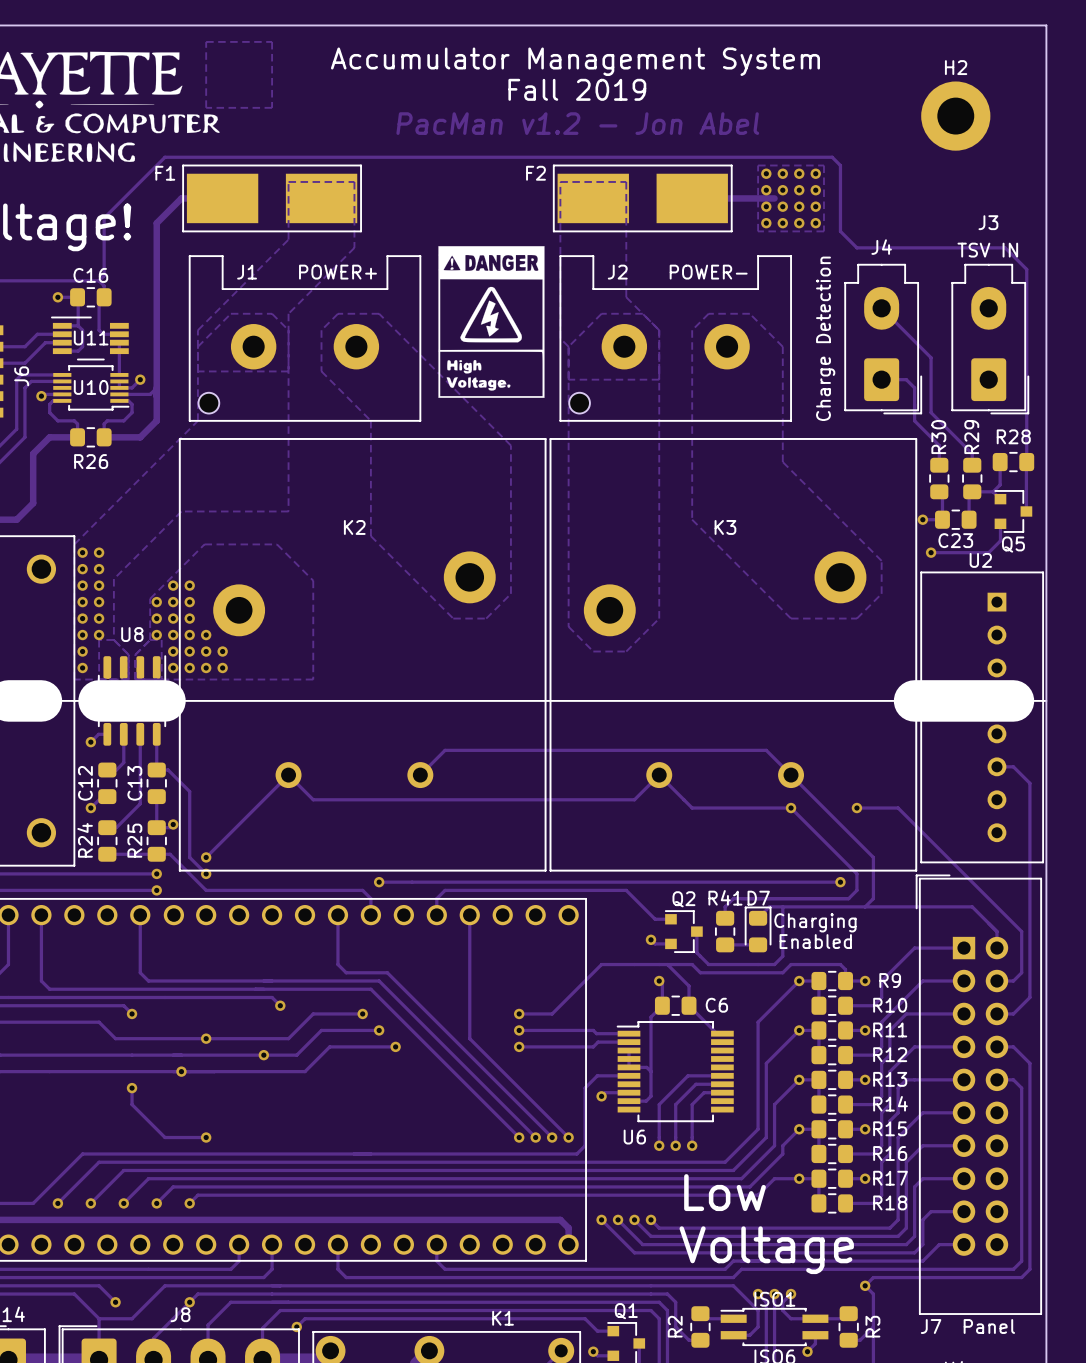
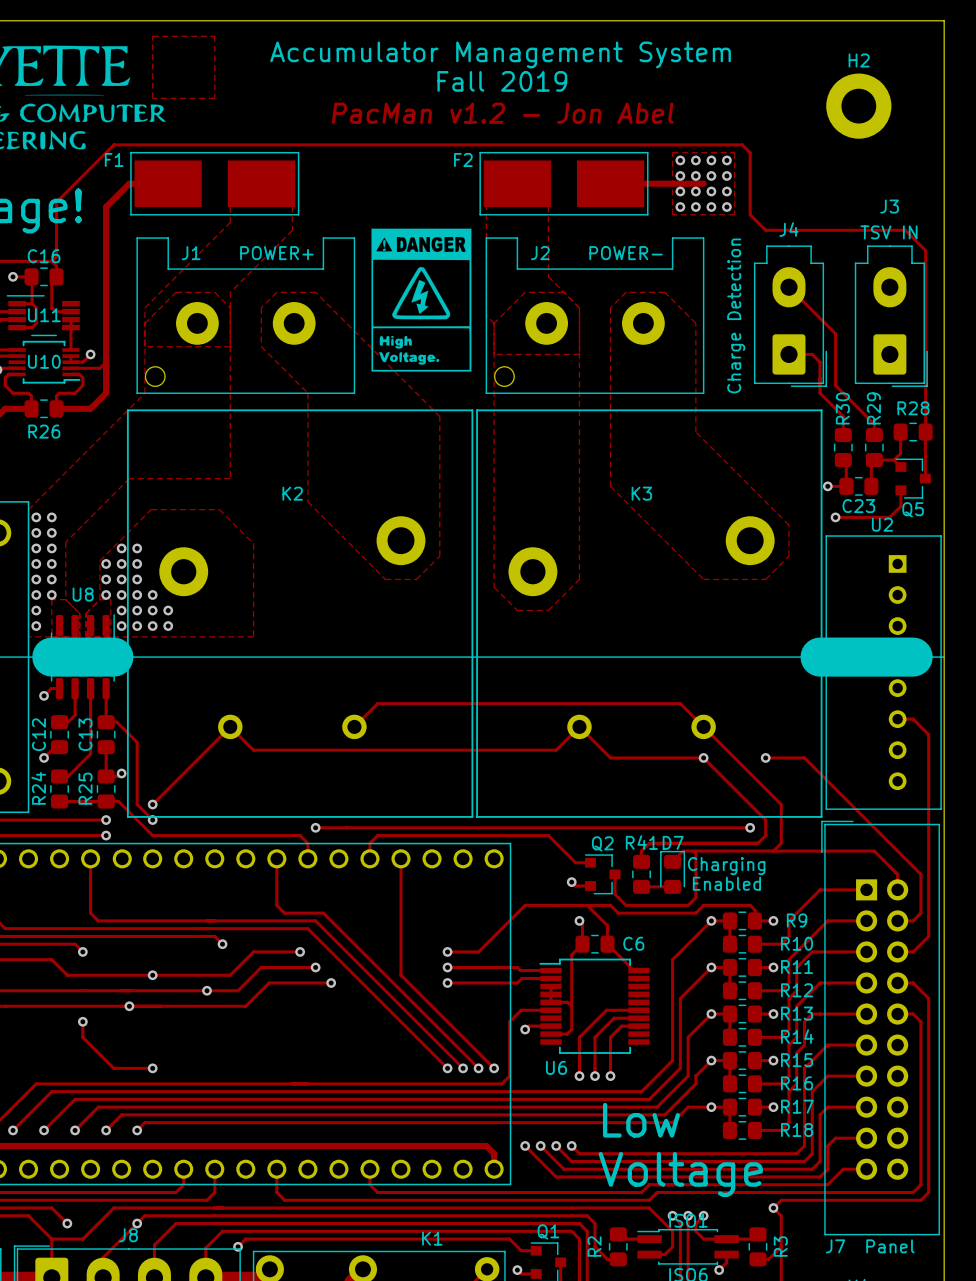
track: none -> (688, 183) (703, 183)

